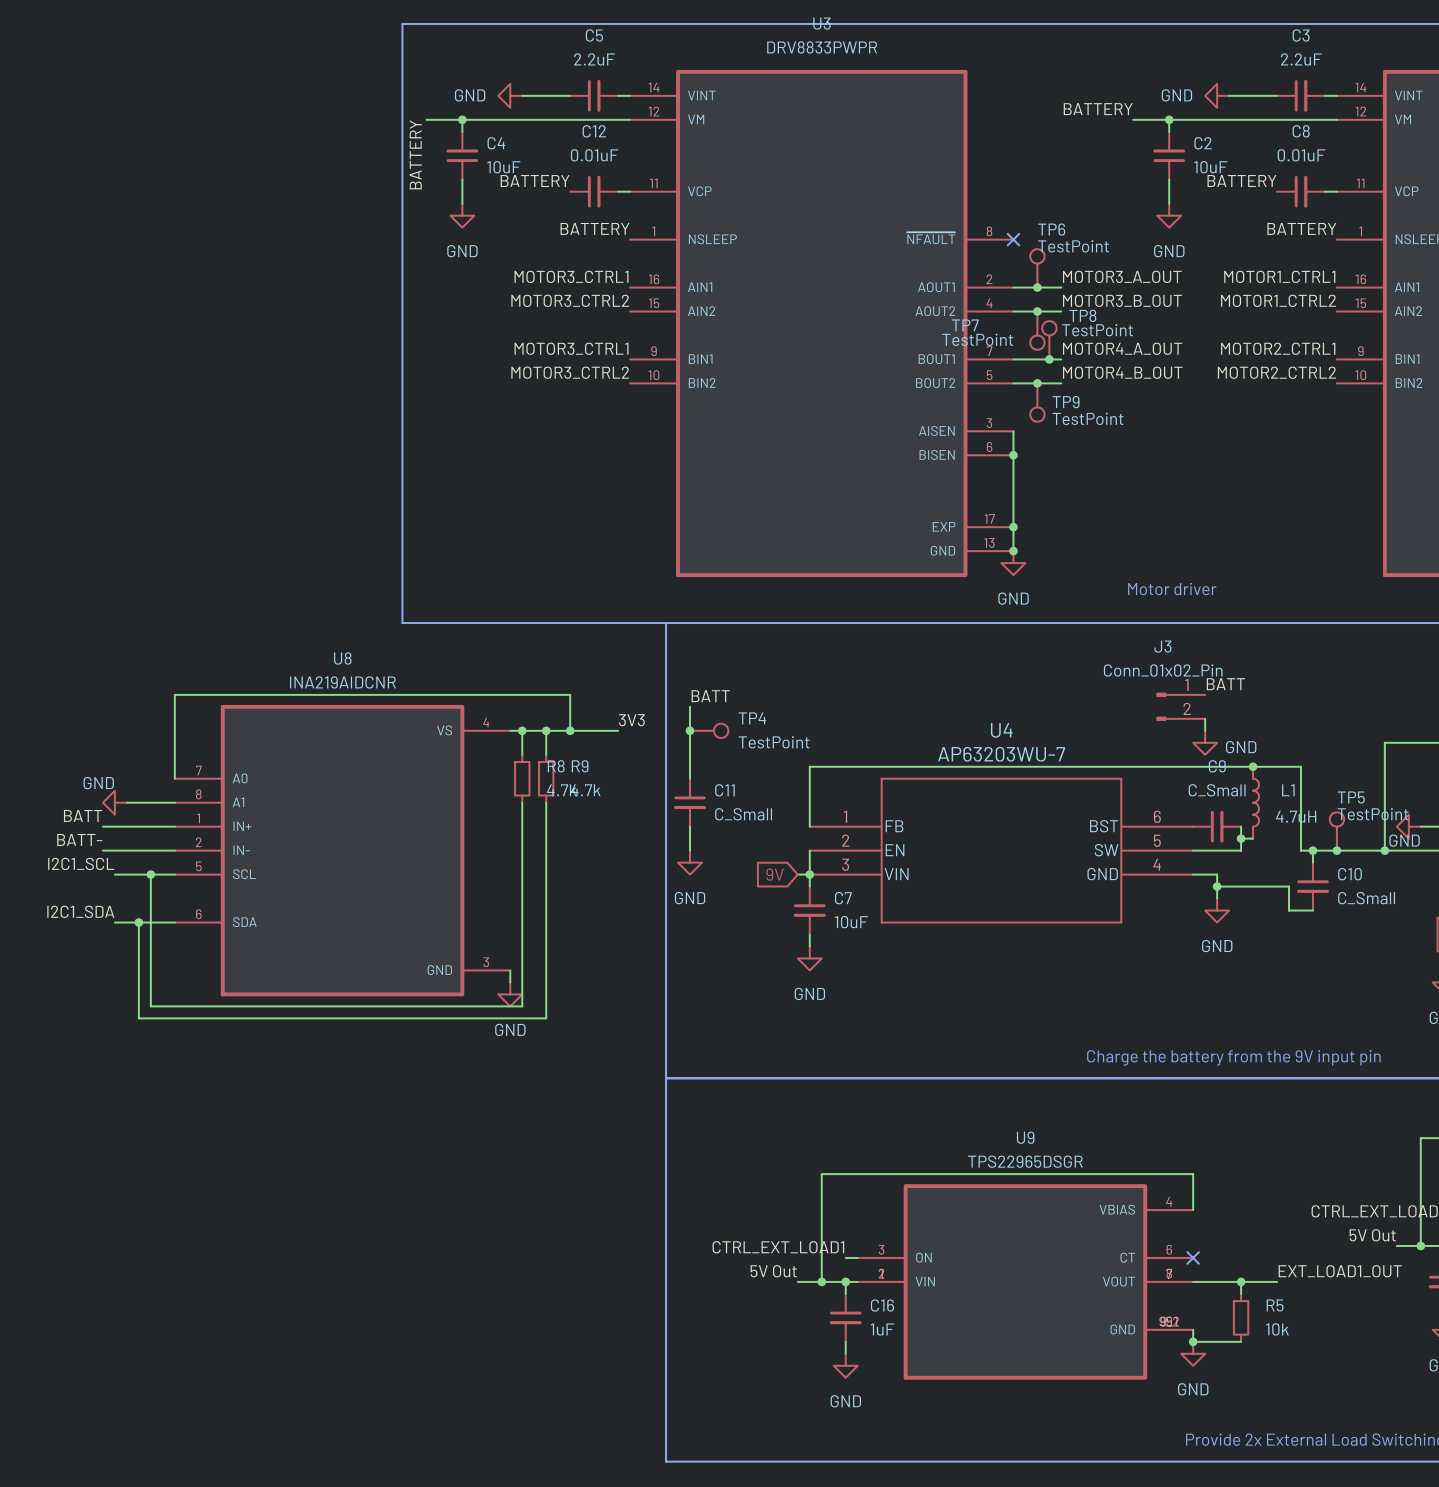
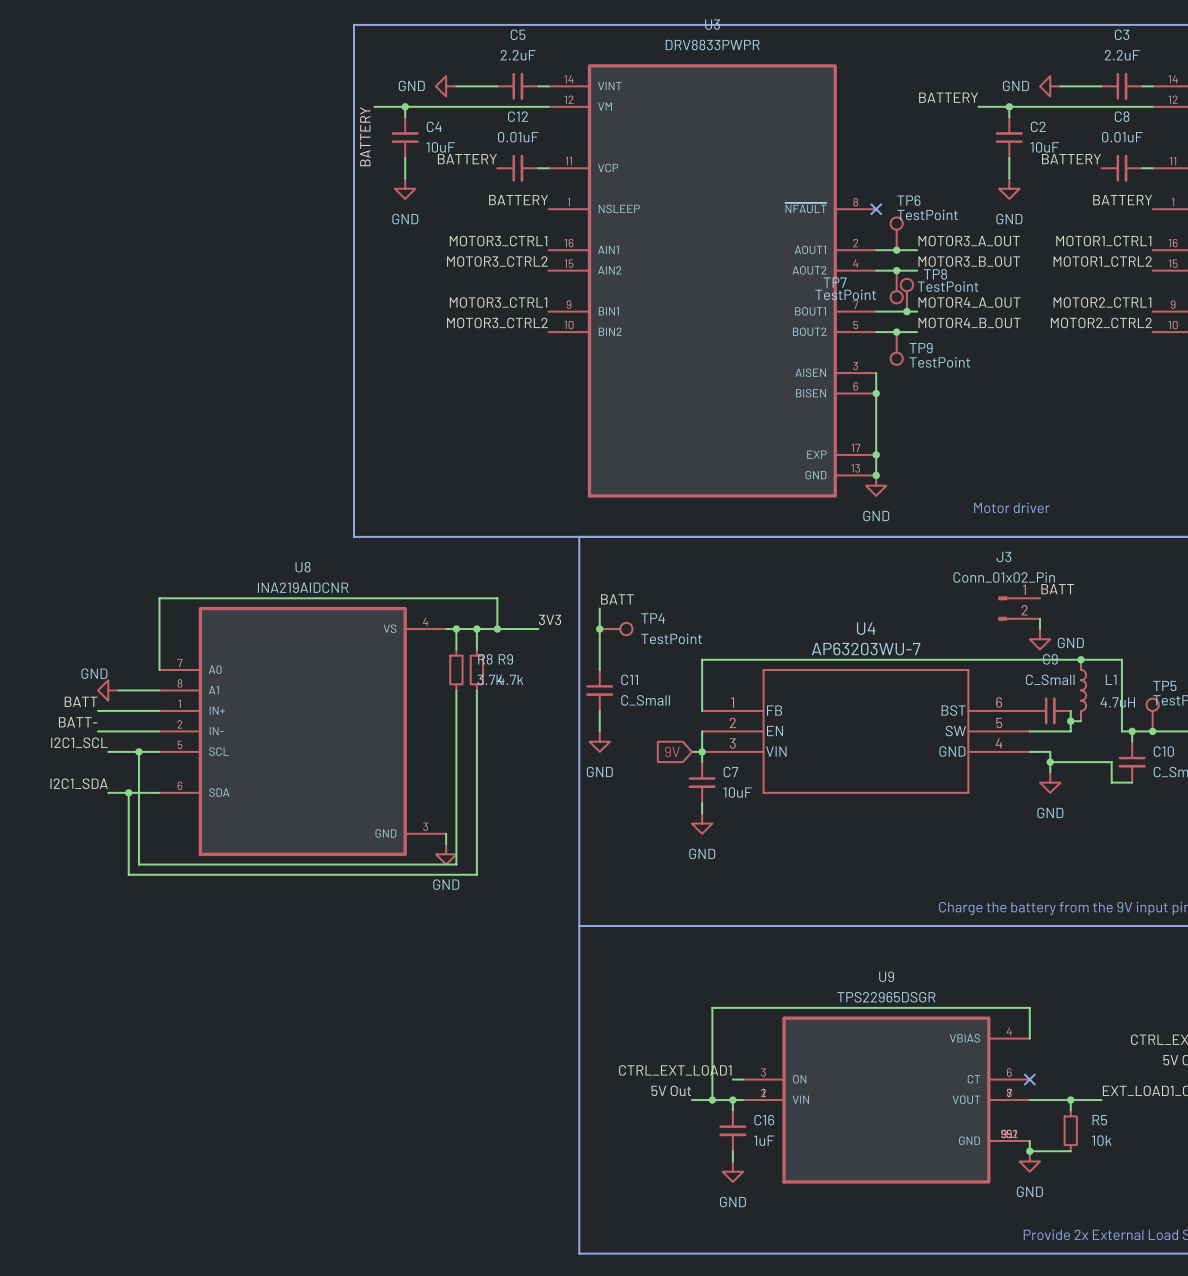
R8 value: 4.7k (561, 790) -> 3.7k (489, 679)

